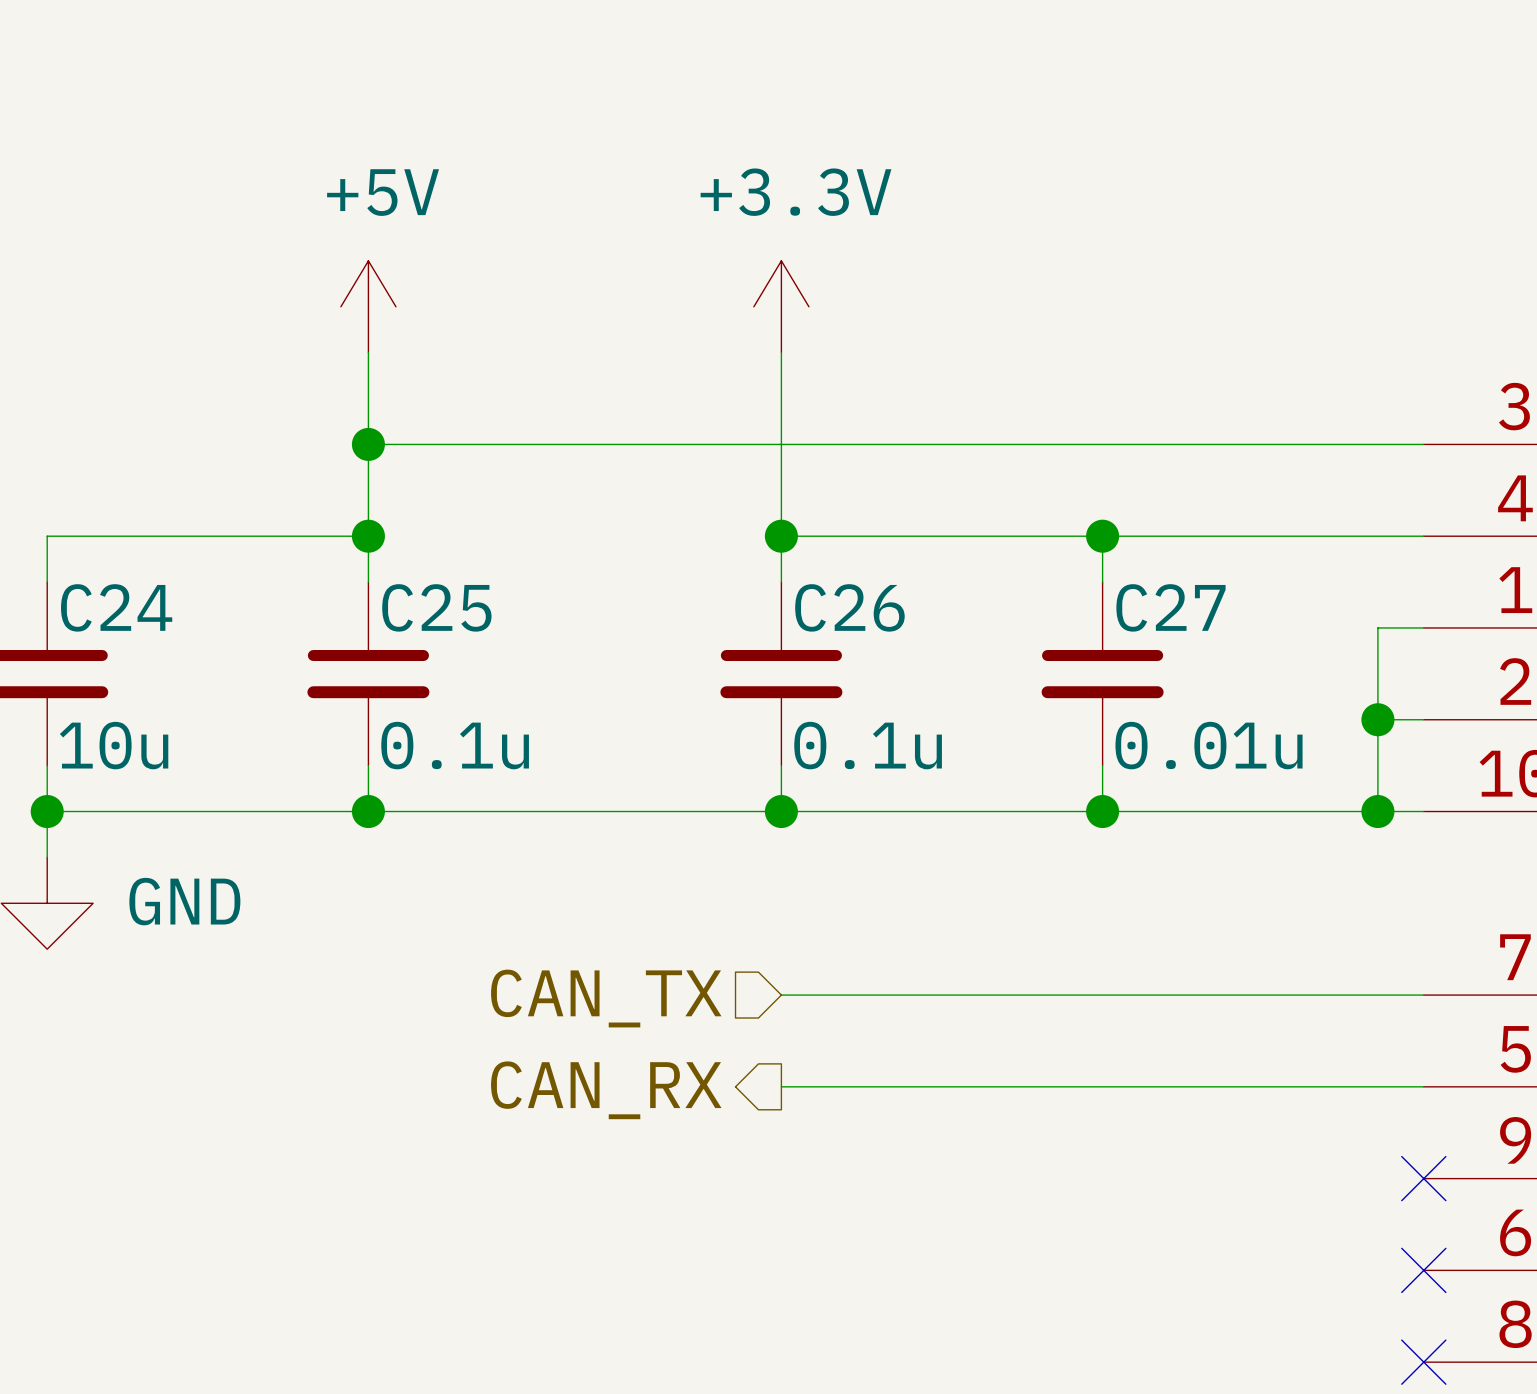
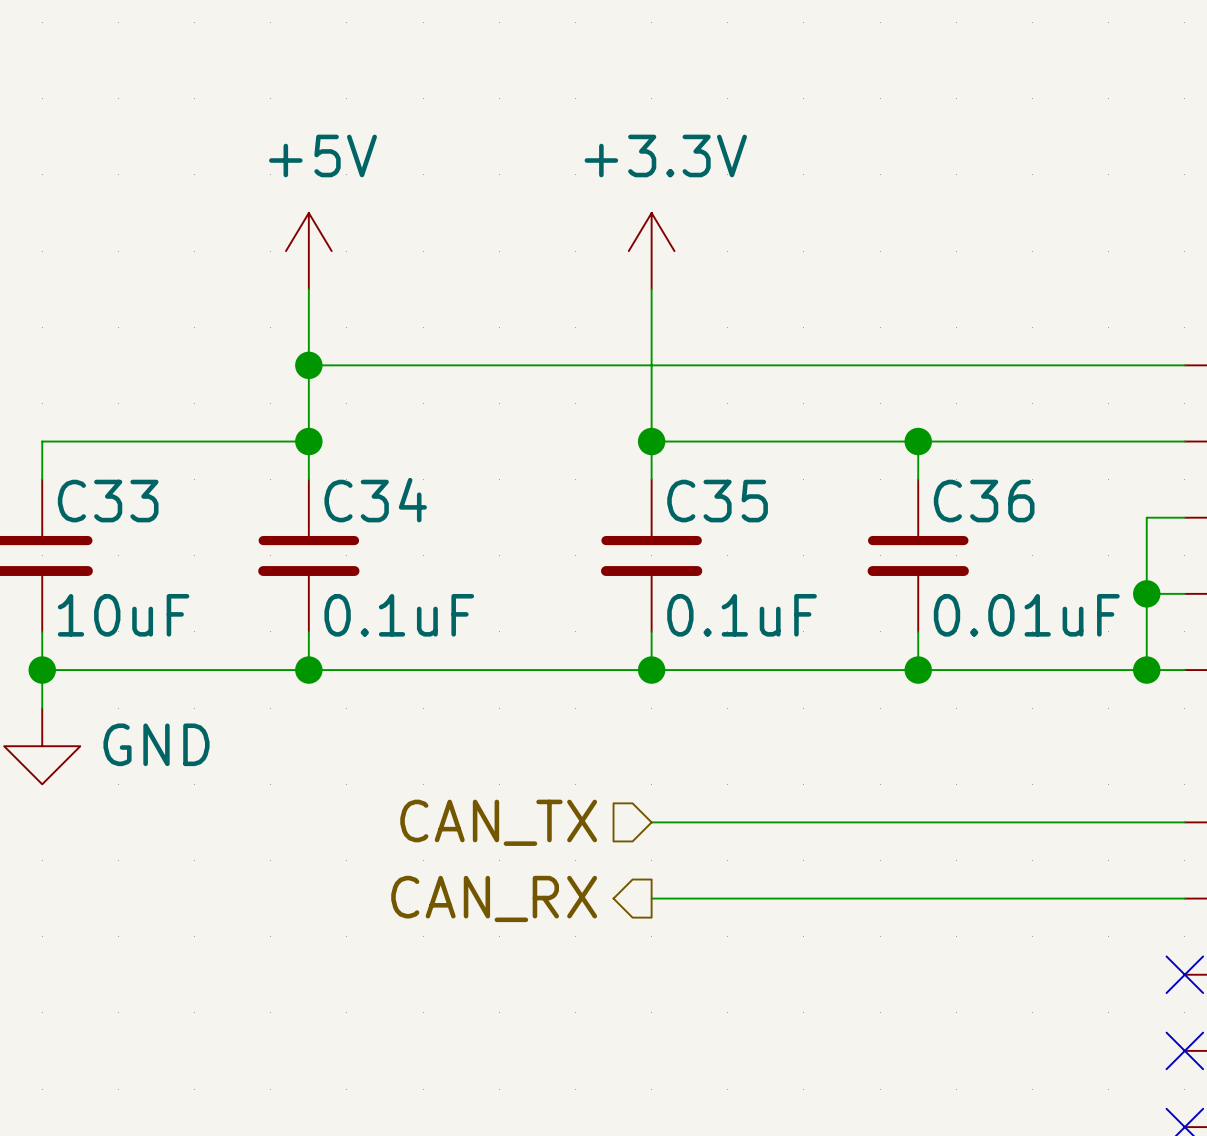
C24 name: C24 (116, 607) -> C33 (108, 501)
C25 name: C25 (436, 607) -> C34 (375, 500)
C26 name: C26 (849, 607) -> C35 (717, 501)
C27 name: C27 (1170, 607) -> C36 (984, 501)
C24 value: 10u (114, 745) -> 10uF (123, 615)
C25 value: 0.1u (455, 745) -> 0.1uF (399, 615)
C26 value: 0.1u (868, 745) -> 0.1uF (742, 615)
C27 value: 0.01u (1209, 745) -> 0.01uF (1026, 615)

